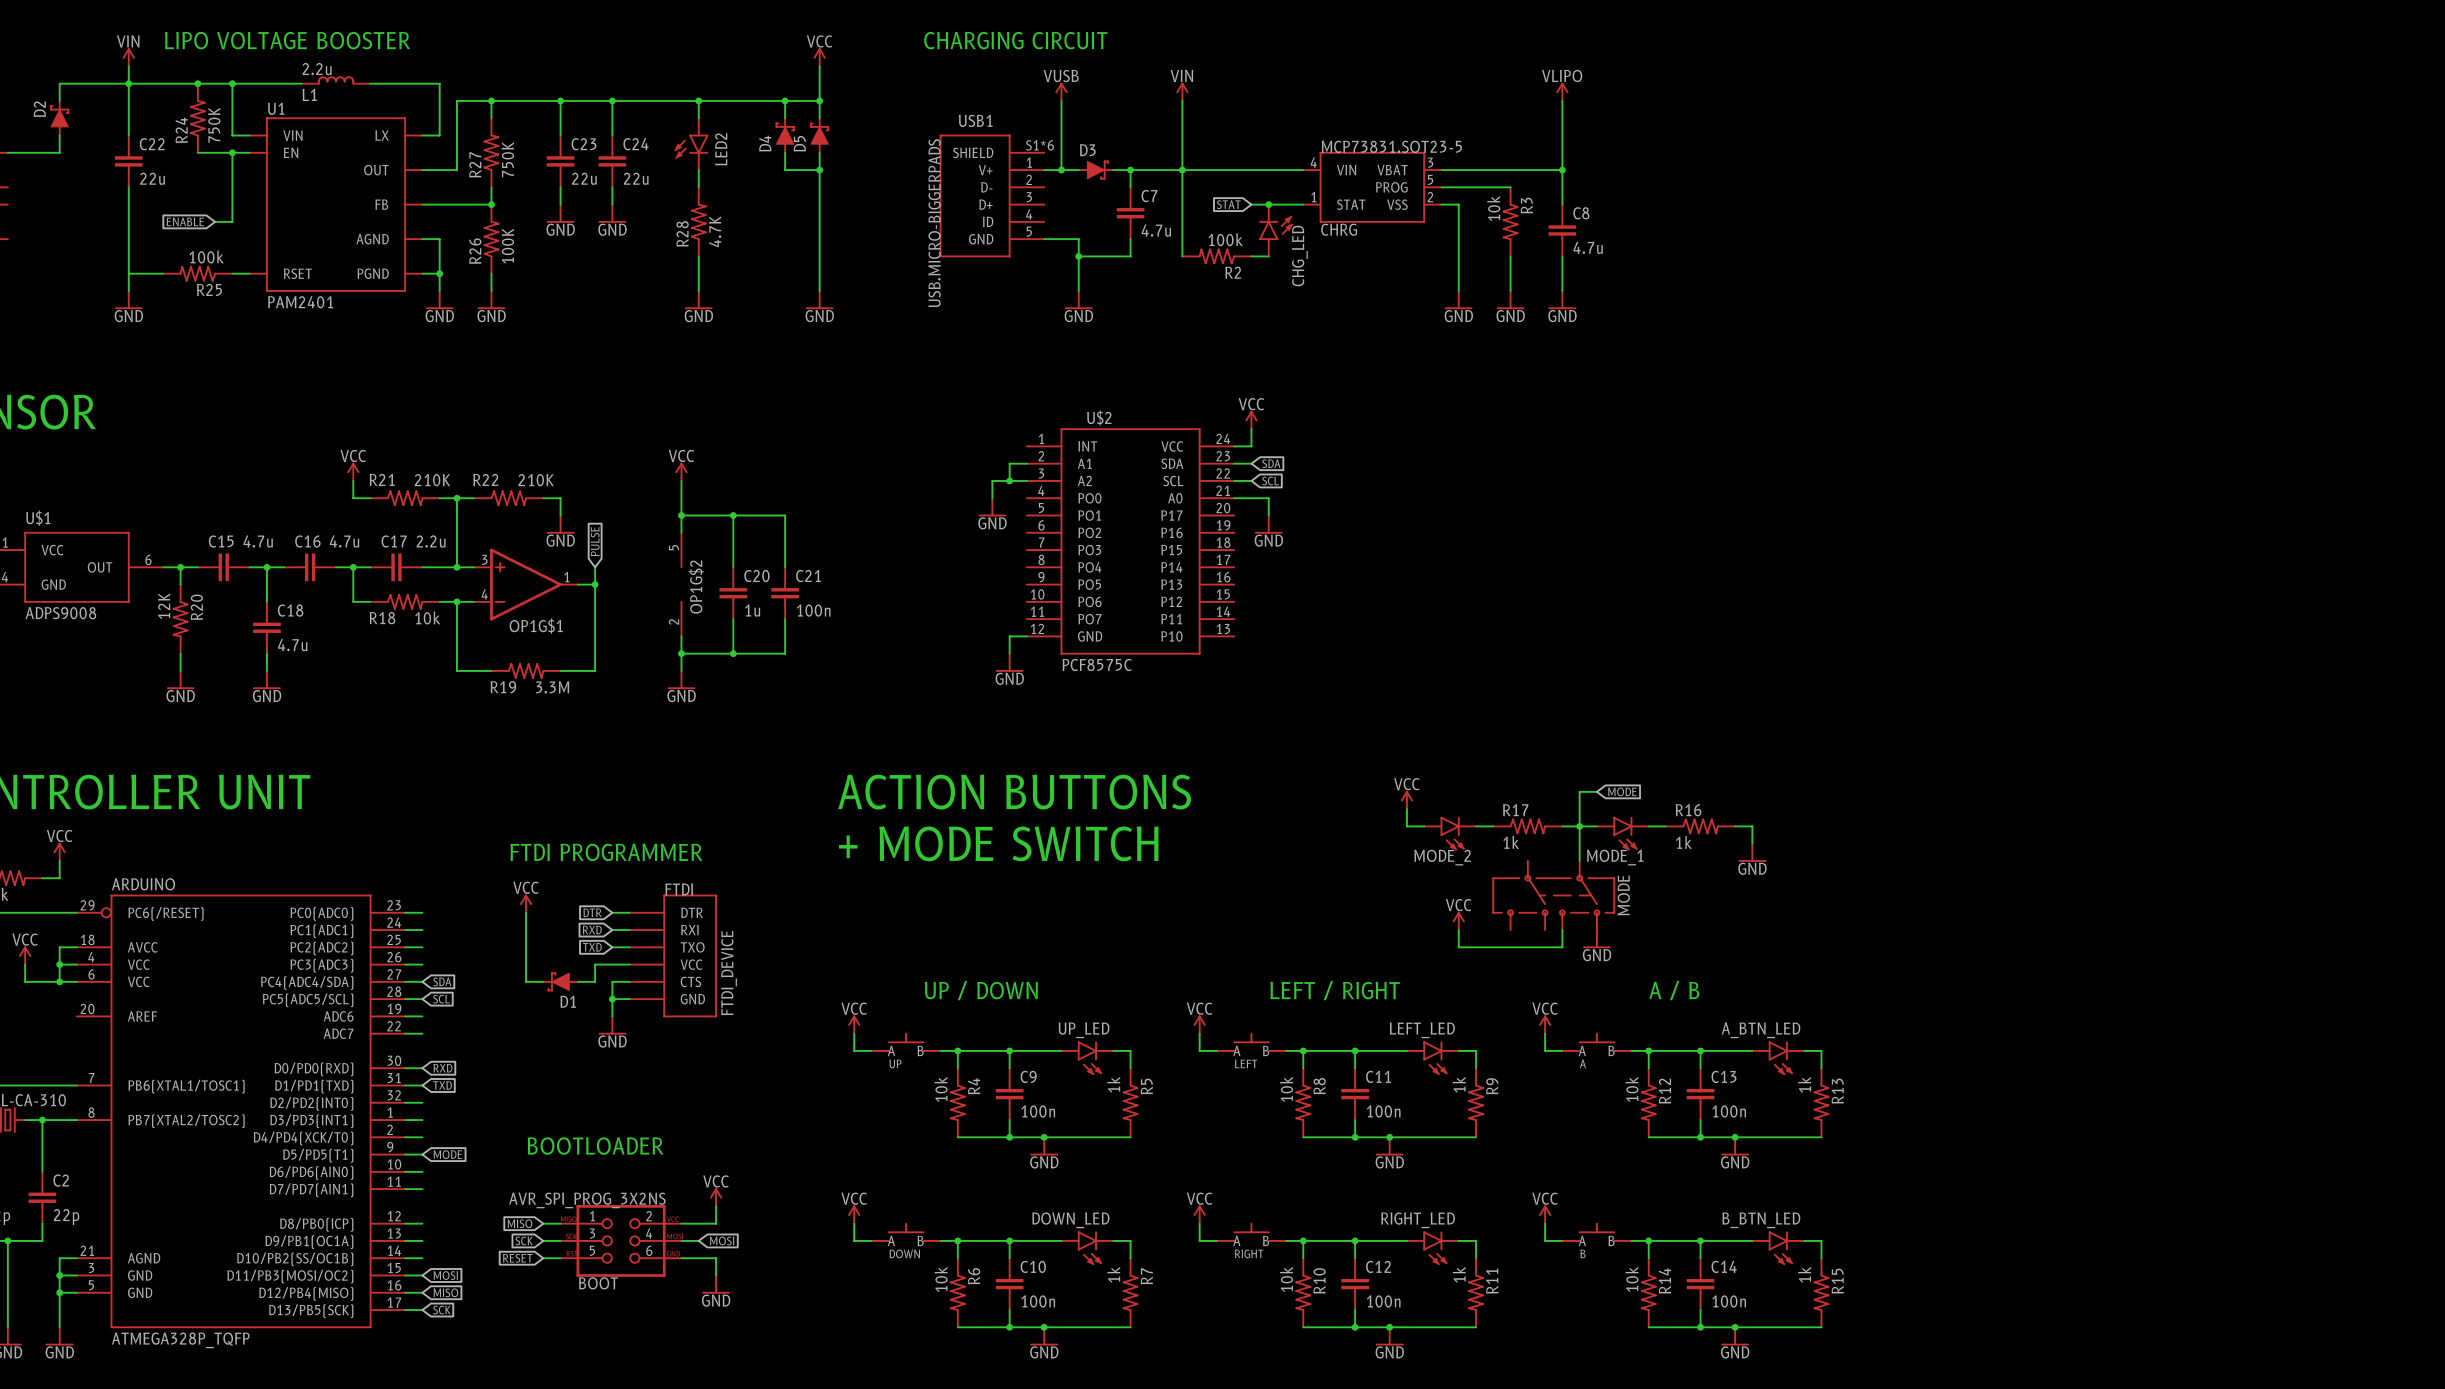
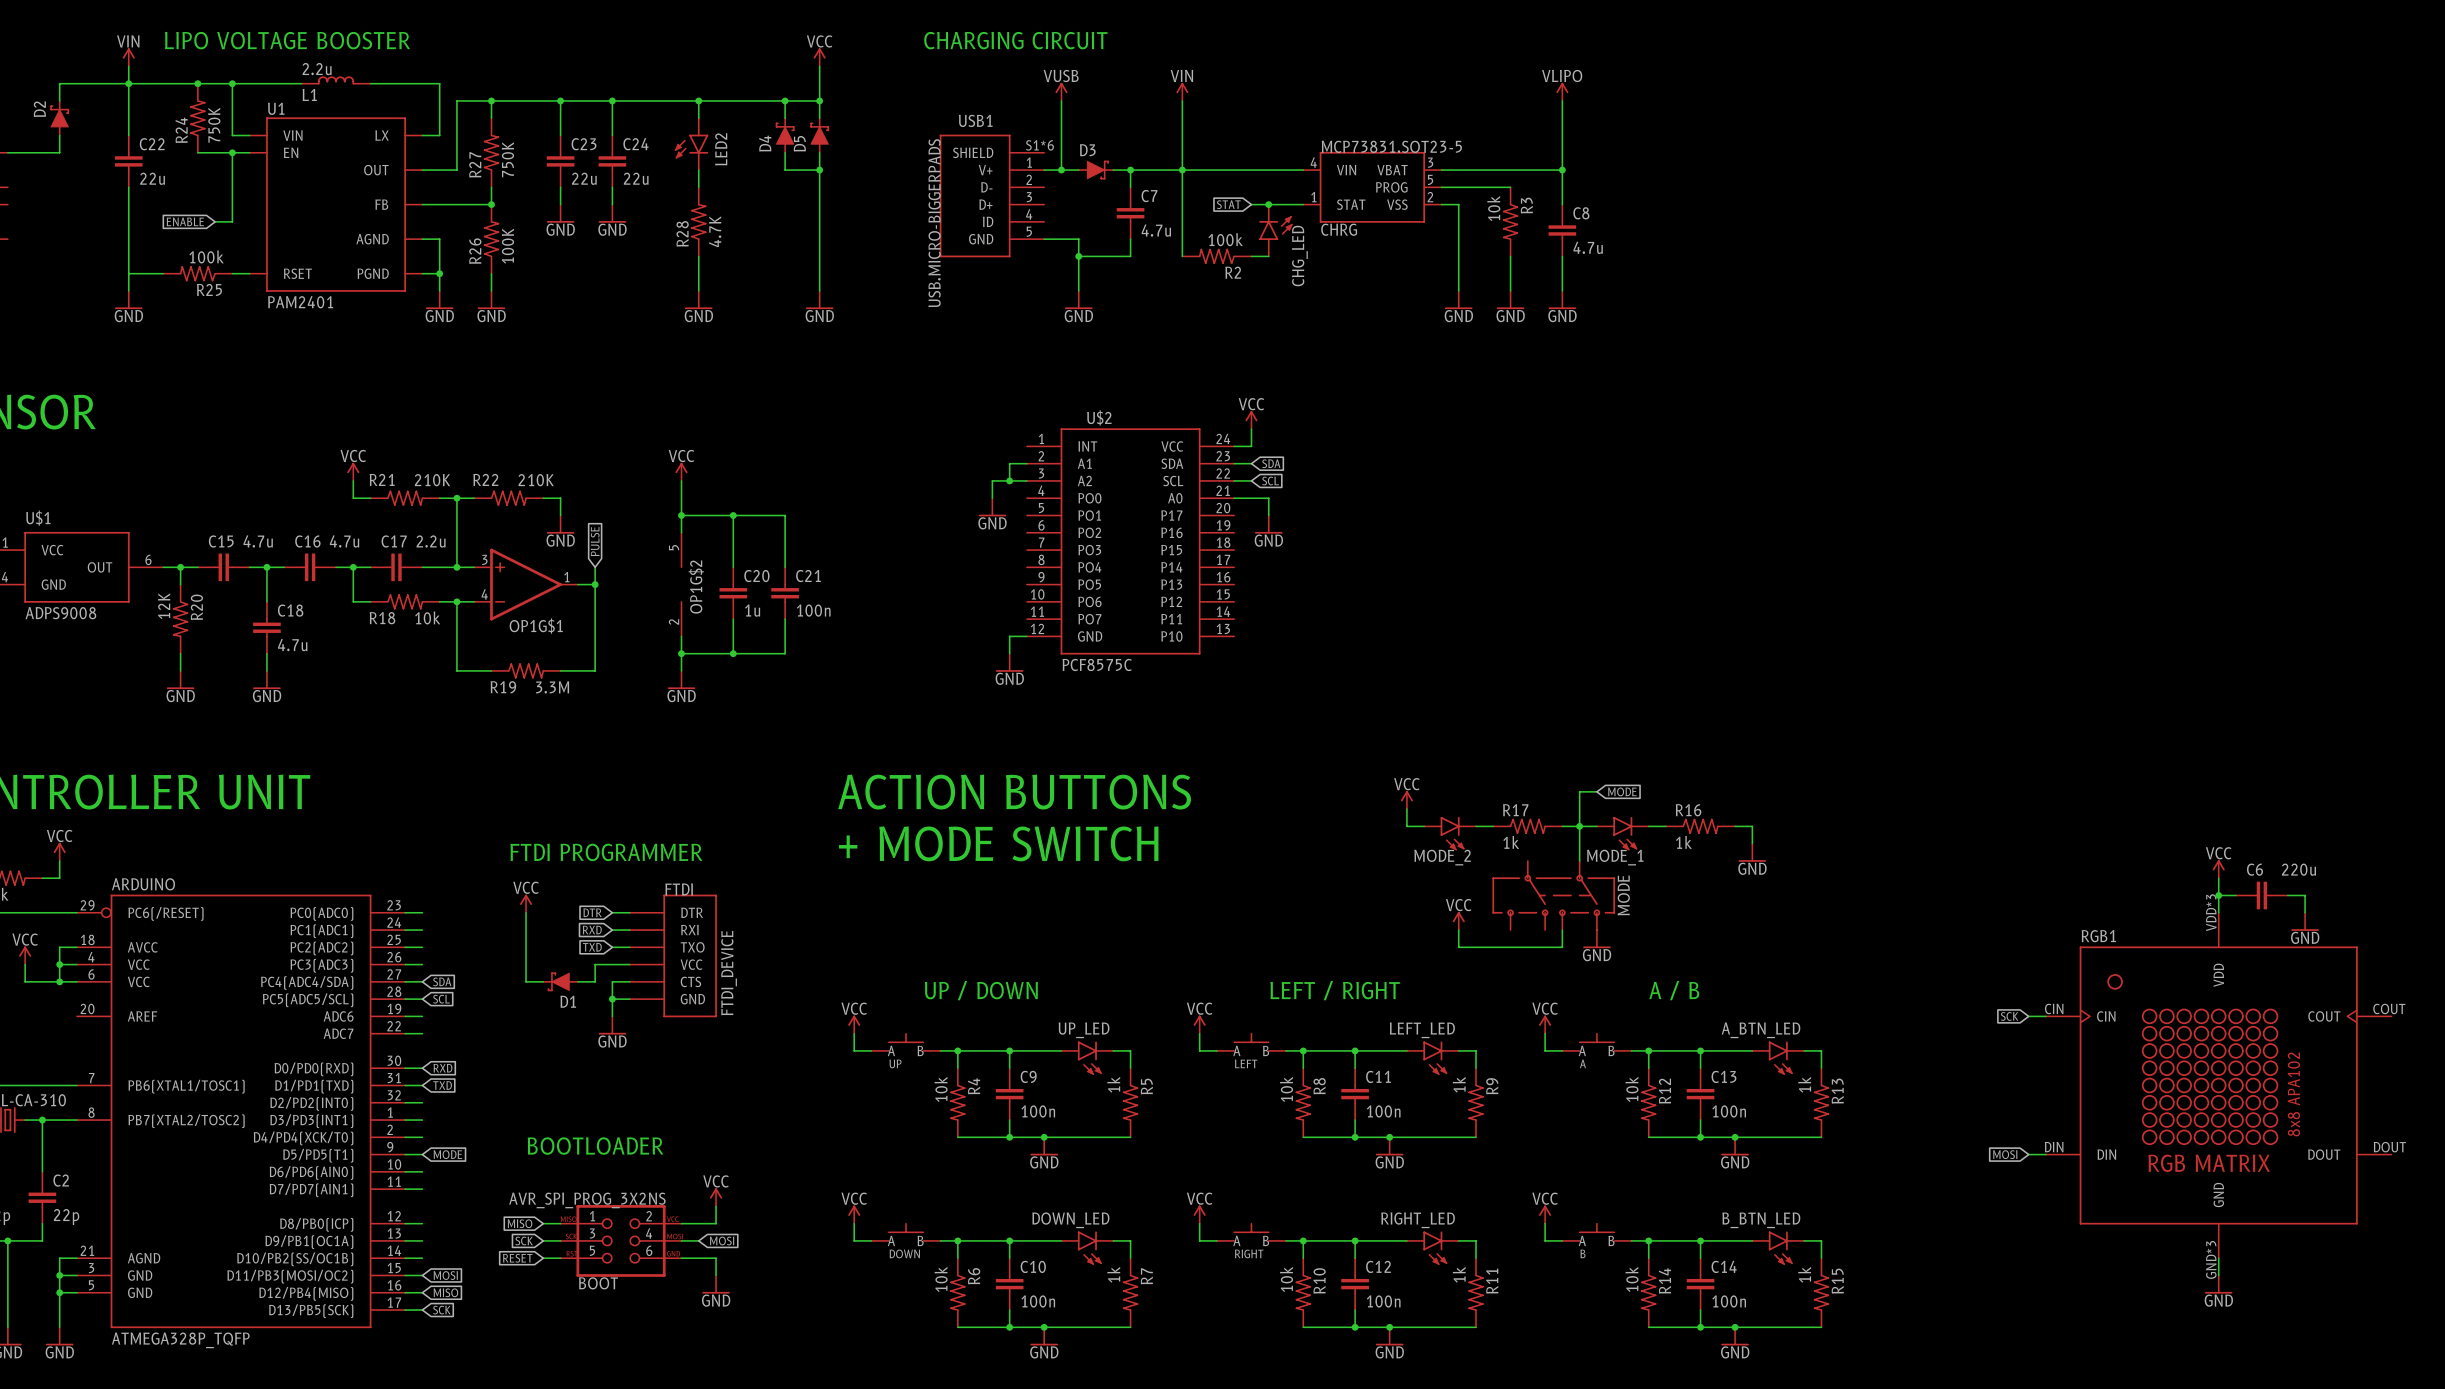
power symbol: none -> VCC (2218, 869)
wire: none -> (2218, 878) (2218, 912)
wire: none -> (2218, 895) (2235, 895)
junction: none -> (2218, 895)
C6: none -> 220u (2261, 895)
wire: none -> (2287, 895) (2305, 895) (2305, 912)
power symbol: none -> GND (2305, 921)
global label: none -> SCK (2009, 1016)
wire: none -> (2028, 1016) (2046, 1016)
RGB1: none -> (2218, 1085)
global label: none -> MOSI (2005, 1154)
wire: none -> (2028, 1154) (2046, 1154)
wire: none -> (2218, 1258) (2218, 1275)
power symbol: none -> GND (2218, 1284)

